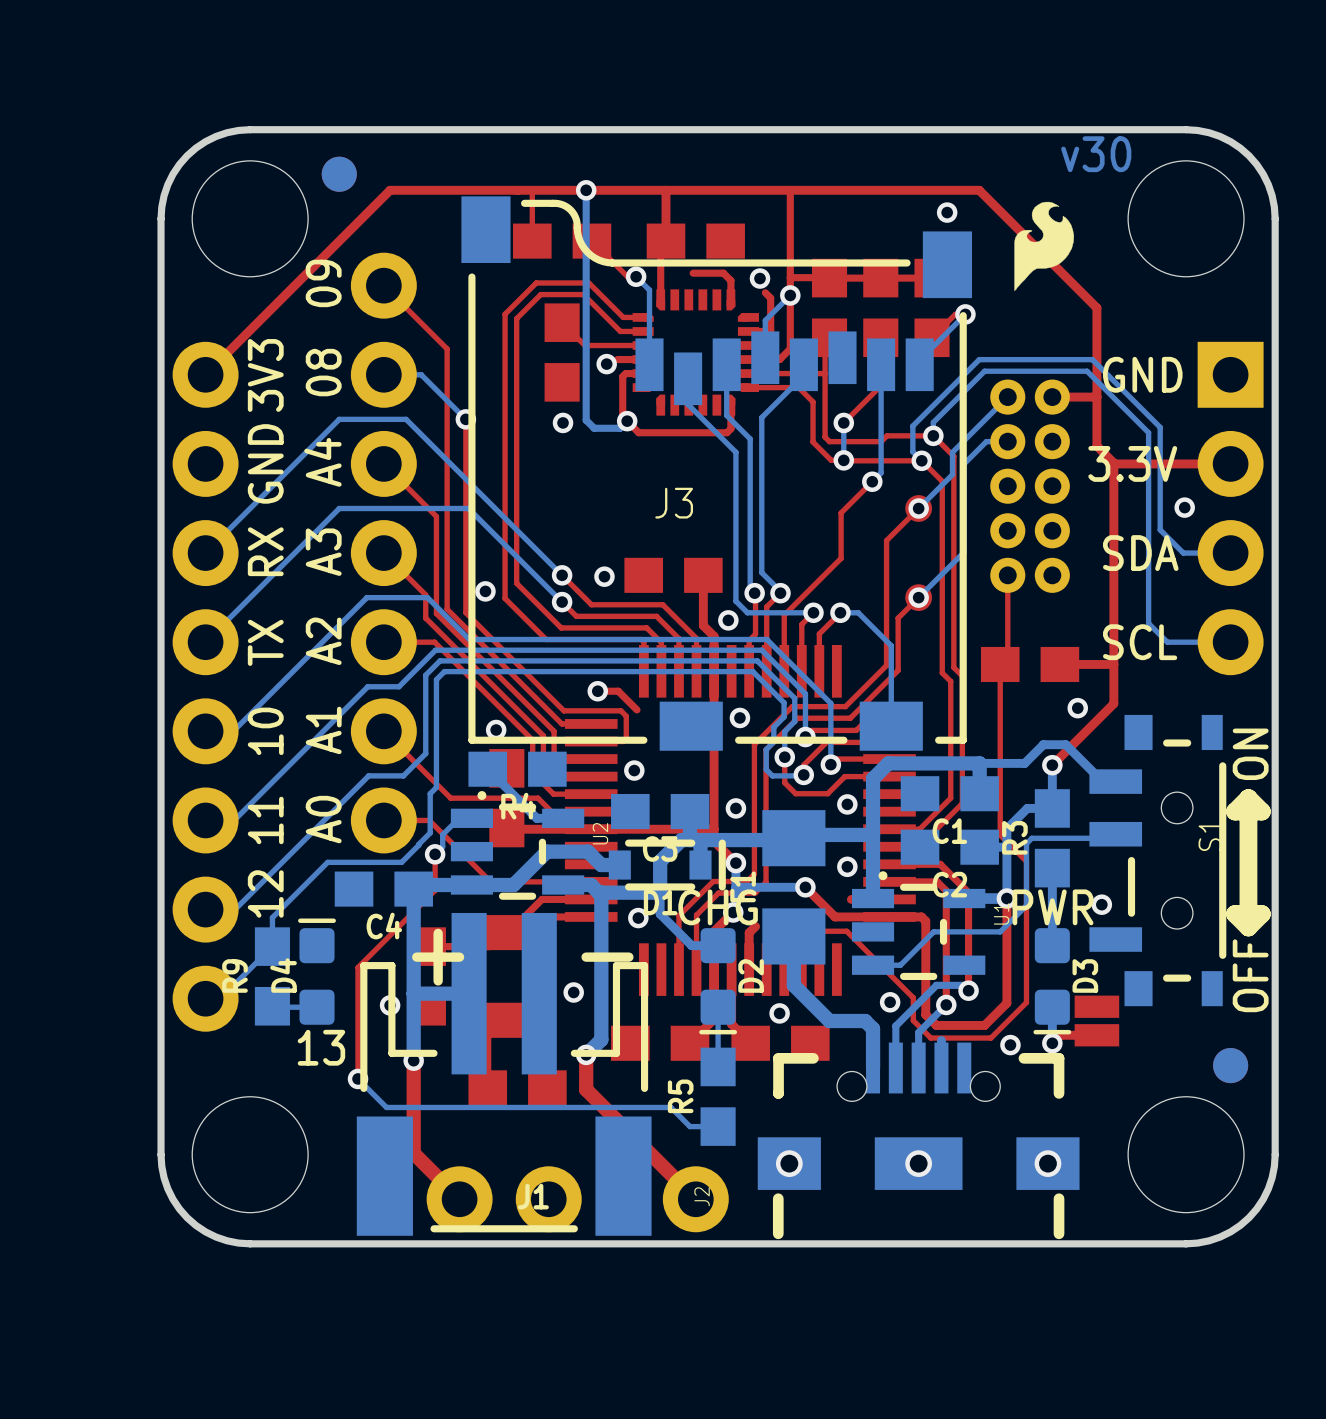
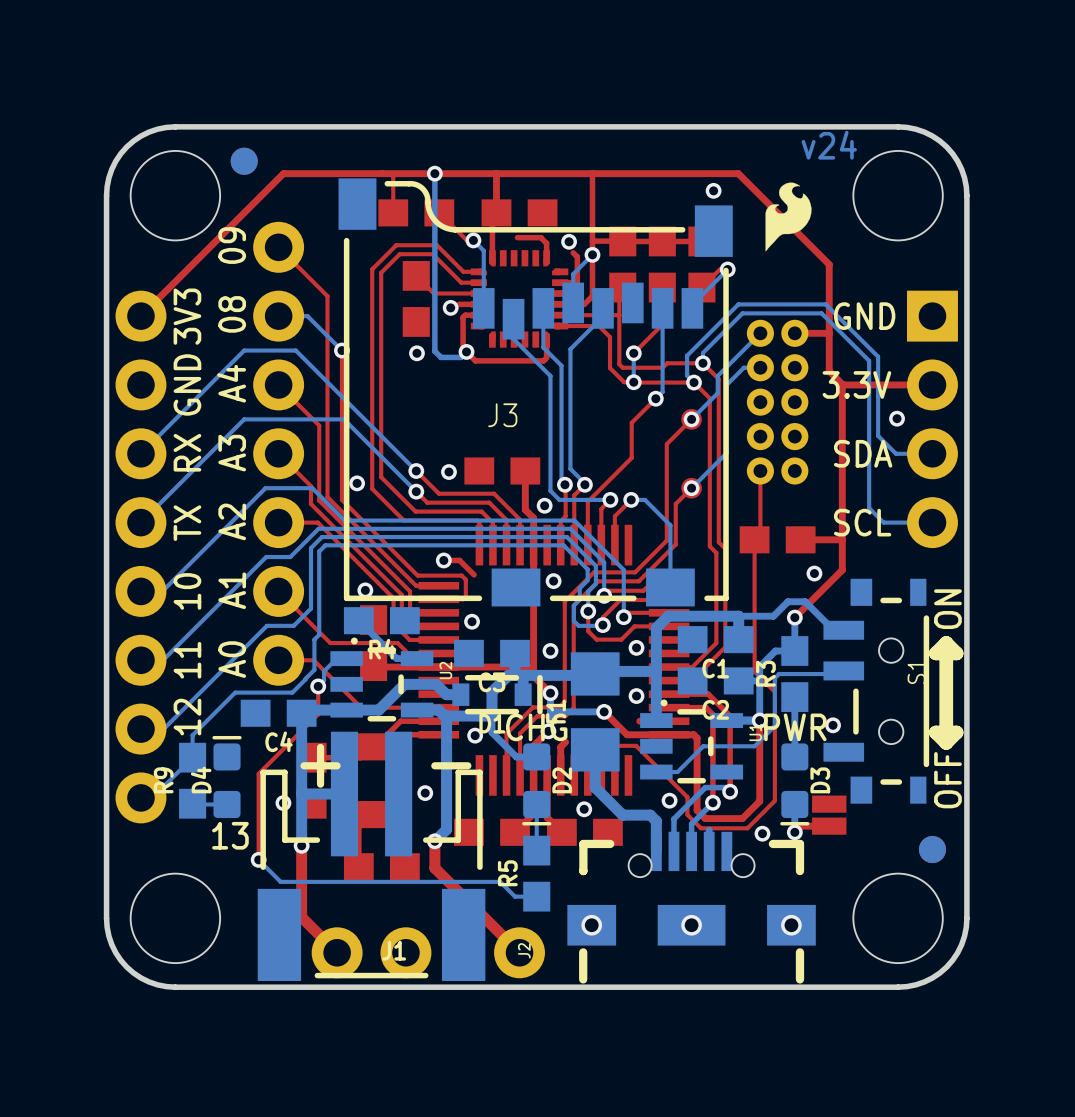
text: v30 (1096, 154) -> v24 (829, 145)

